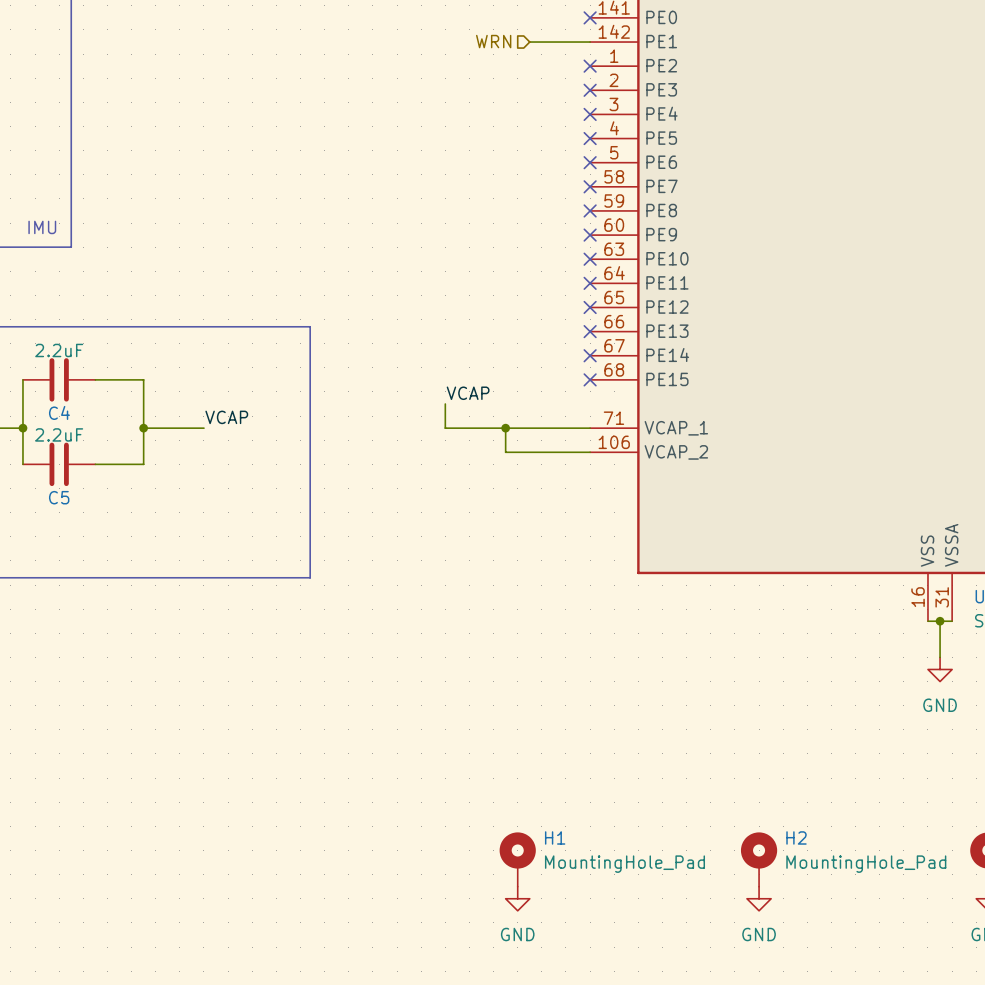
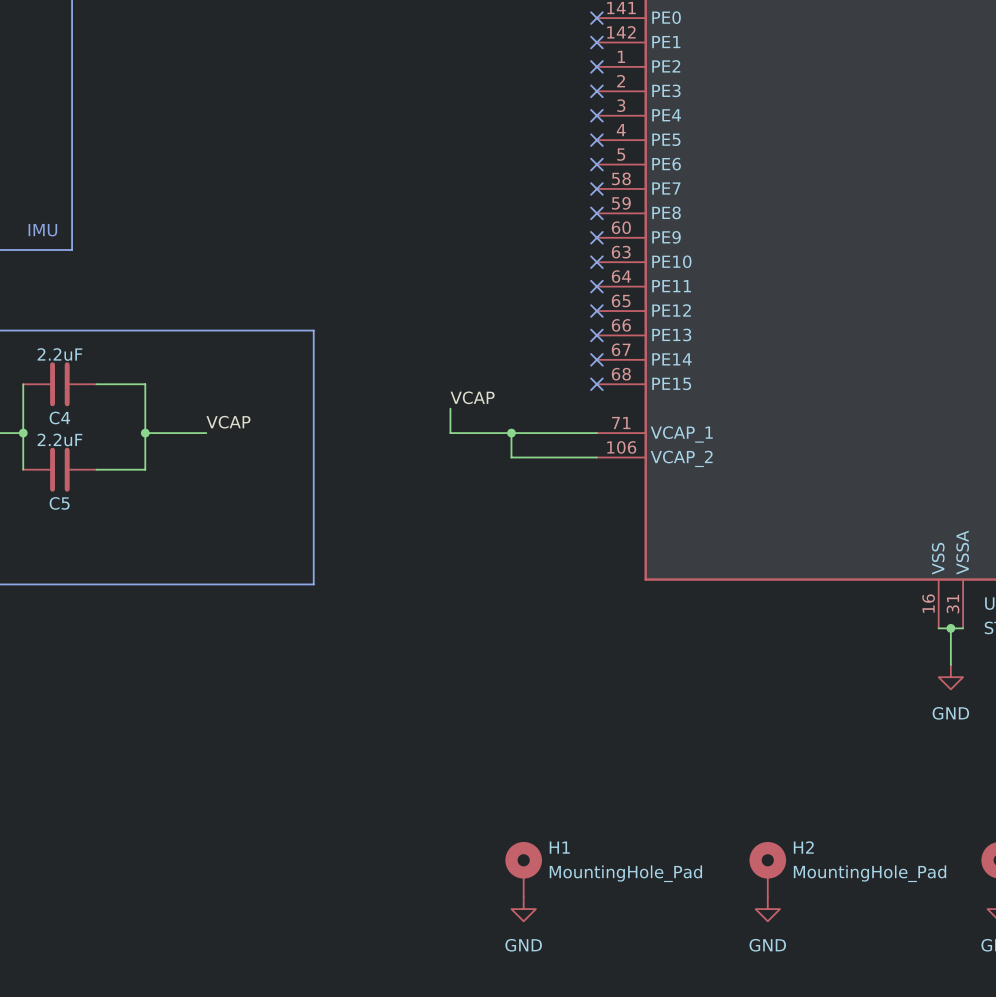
hierarchical label: WRN (493, 41) -> none
wire: (529, 42) (590, 42) -> none
no-connect mark: none -> (596, 42)

